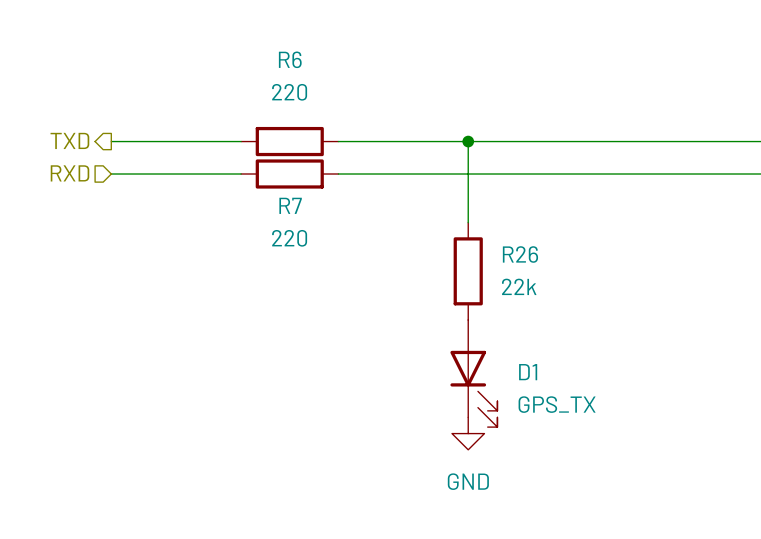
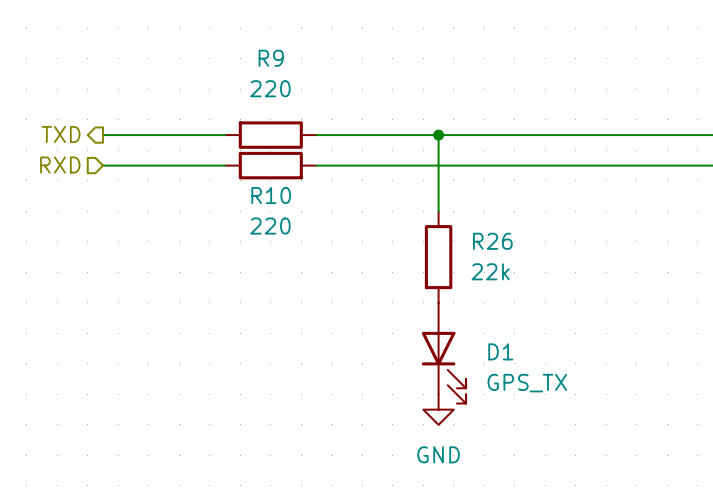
R6 name: R6 (290, 59) -> R9 (271, 58)
R7 name: R7 (290, 205) -> R10 (271, 195)

